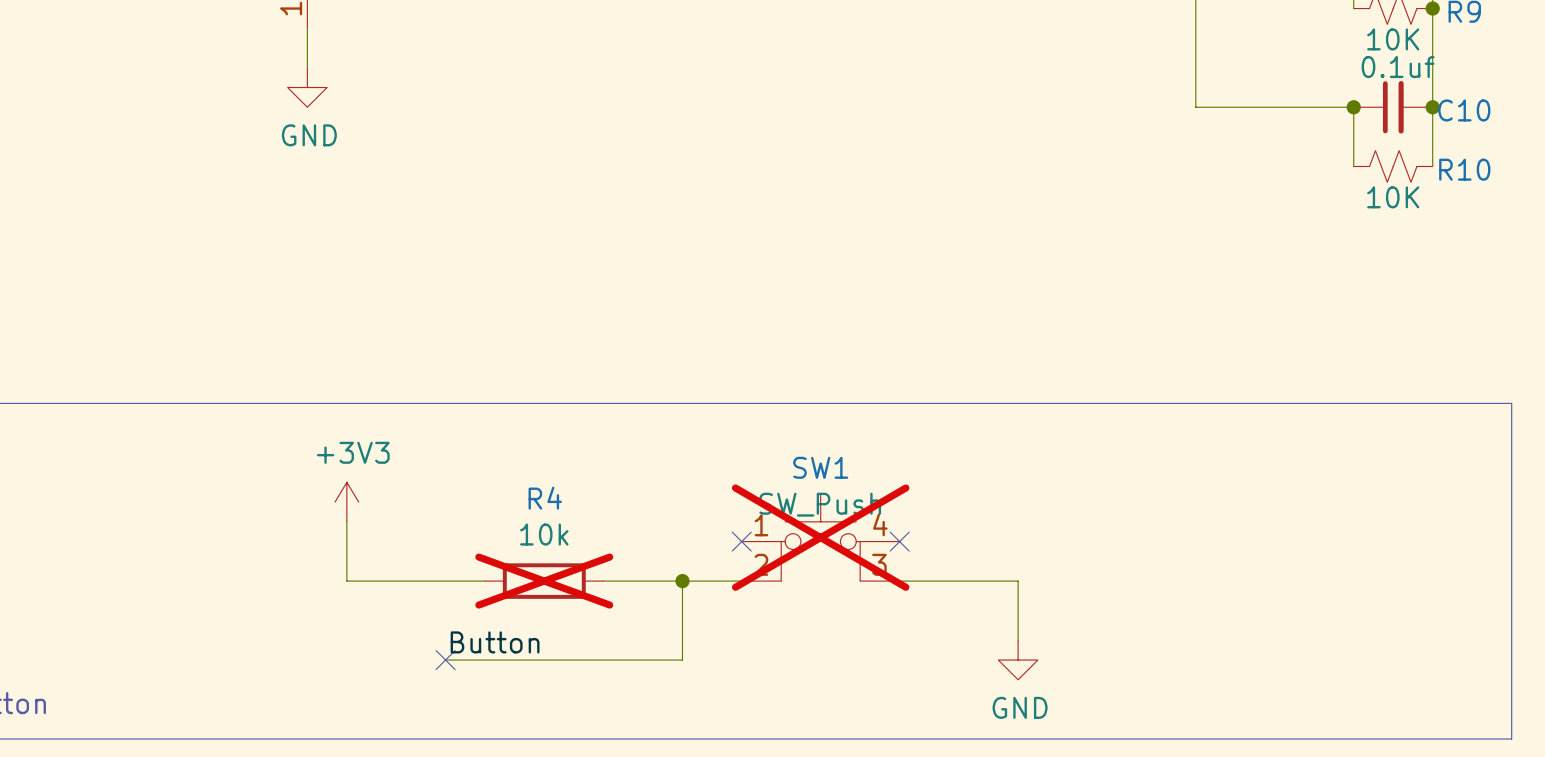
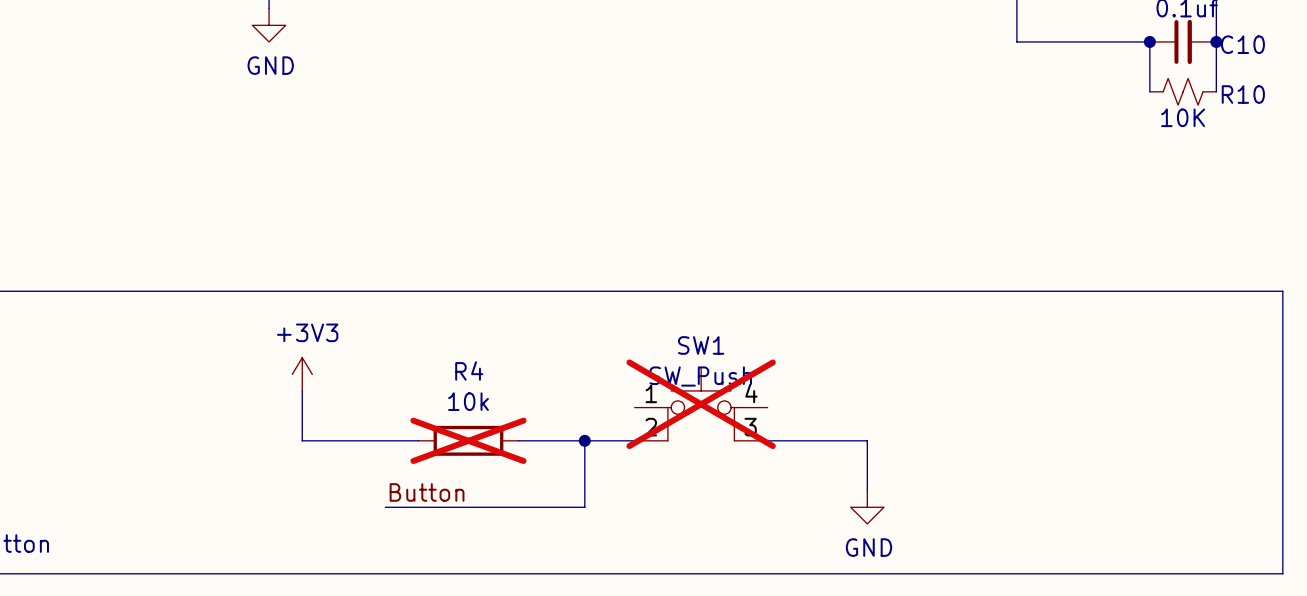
no-connect mark: (741, 541) -> none
no-connect mark: (899, 541) -> none
no-connect mark: (445, 660) -> none

